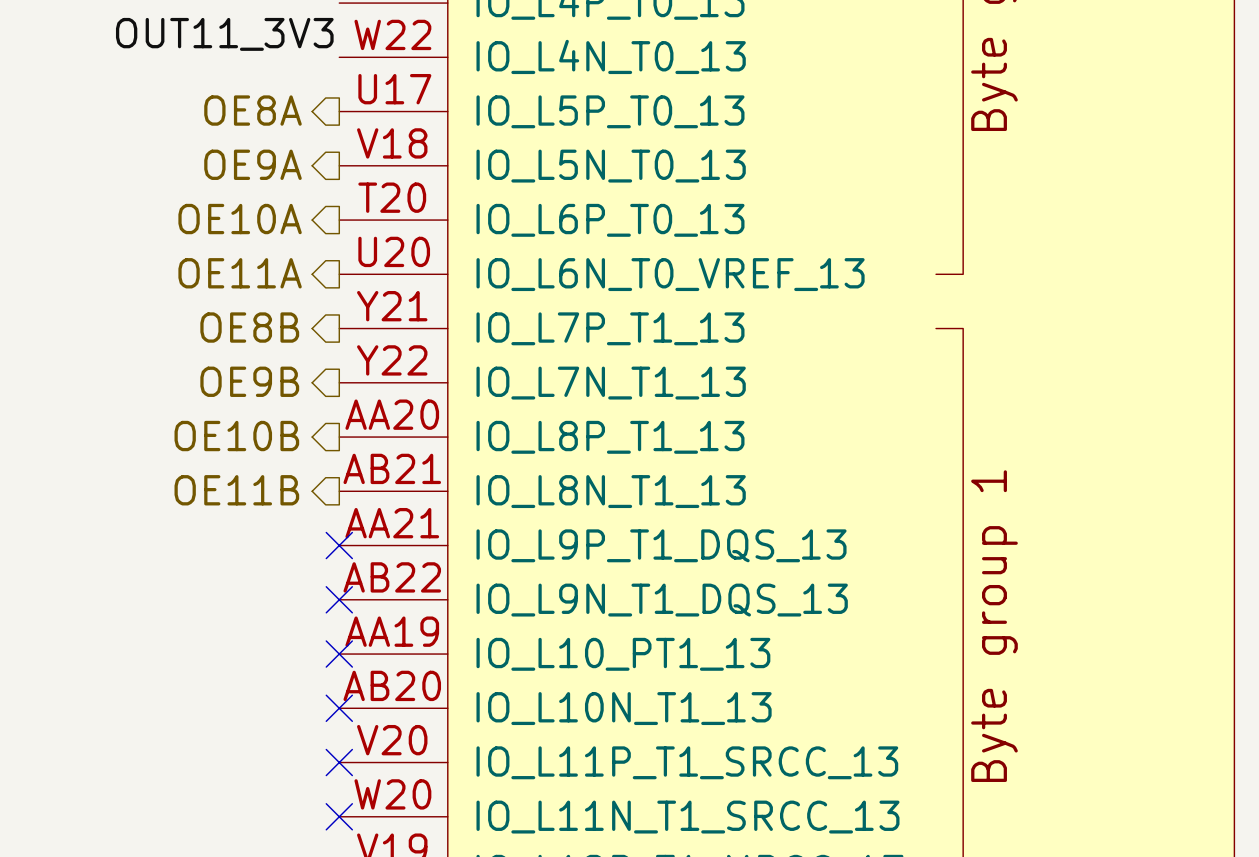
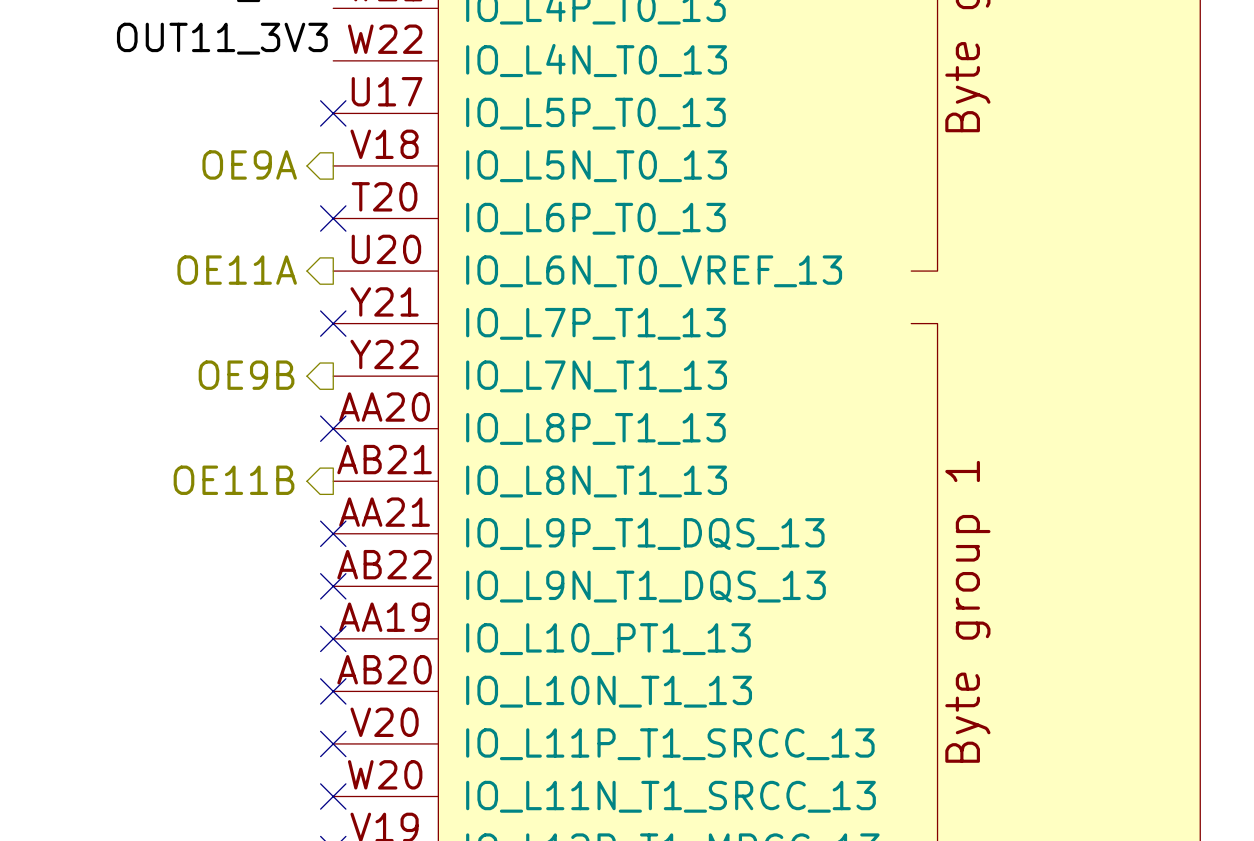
hierarchical label: OE8A (252, 110) -> none
no-connect mark: none -> (333, 113)
hierarchical label: OE10A (240, 219) -> none
no-connect mark: none -> (333, 218)
hierarchical label: OE8B (249, 327) -> none
no-connect mark: none -> (333, 323)
hierarchical label: OE10B (236, 436) -> none
no-connect mark: none -> (333, 428)

